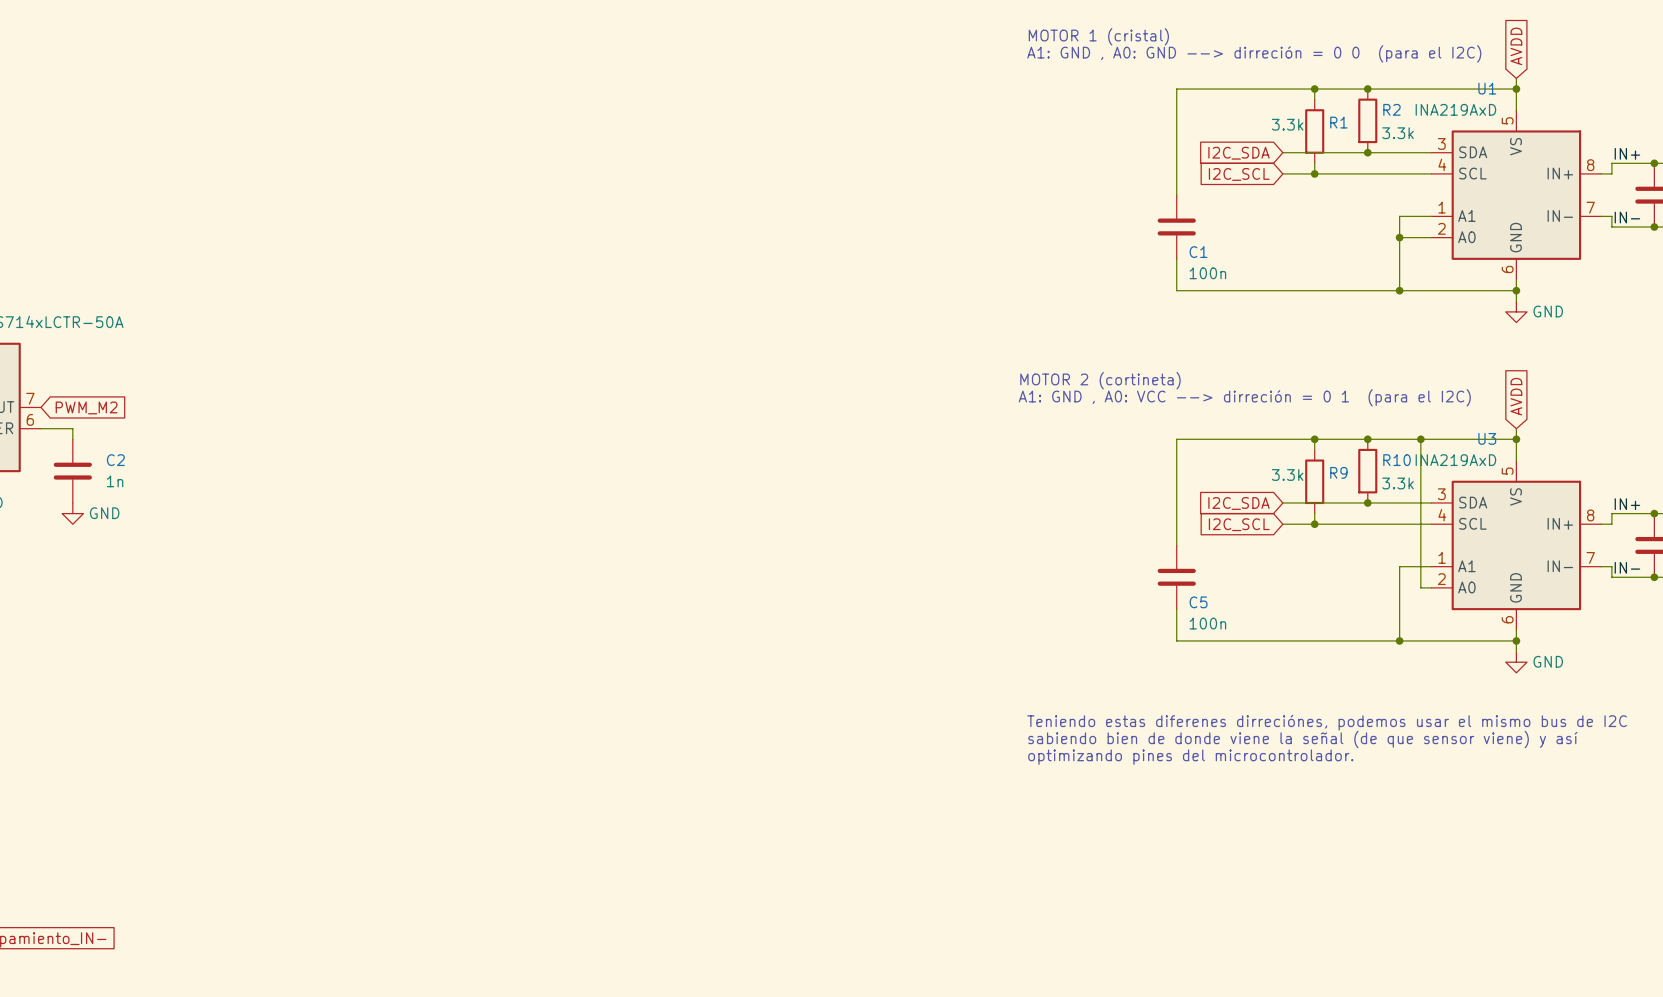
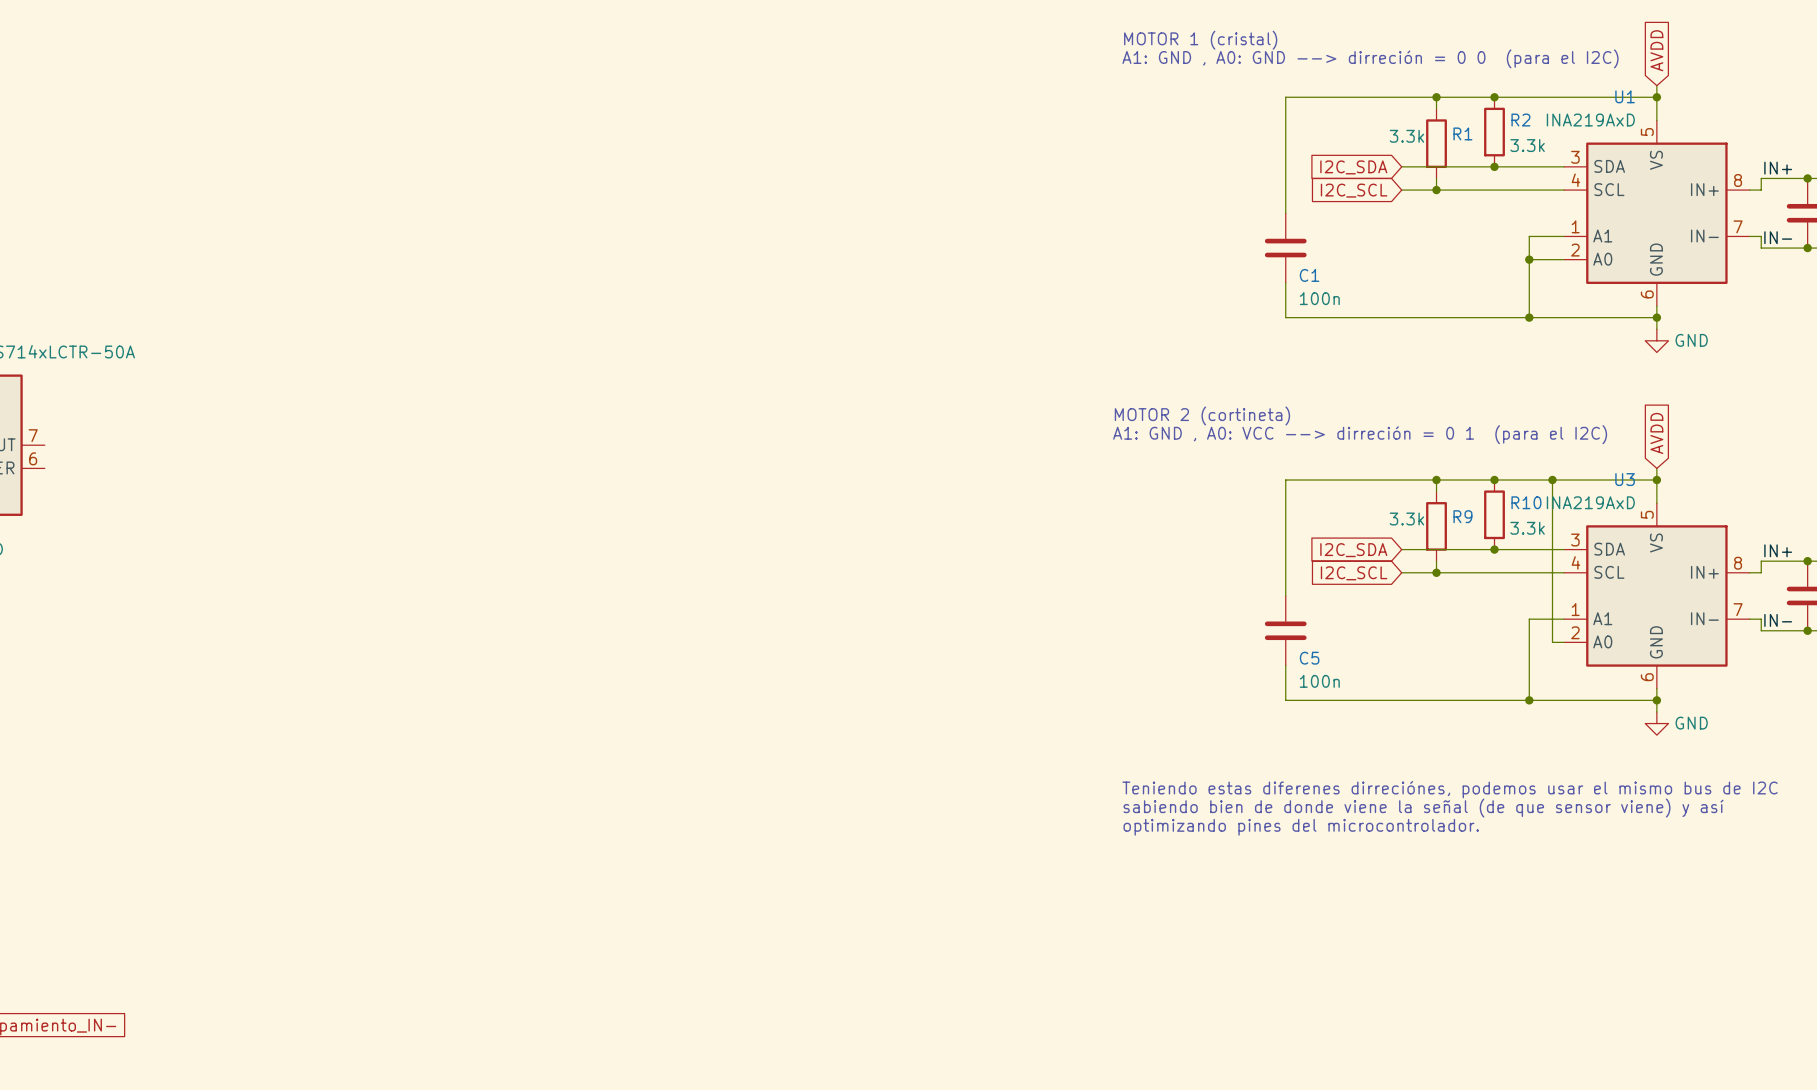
global label: PWM_M2 (86, 407) -> none
wire: (40, 428) (72, 428) (72, 439) -> none
C2: 1n (72, 471) -> none
power symbol: GND (72, 513) -> none

